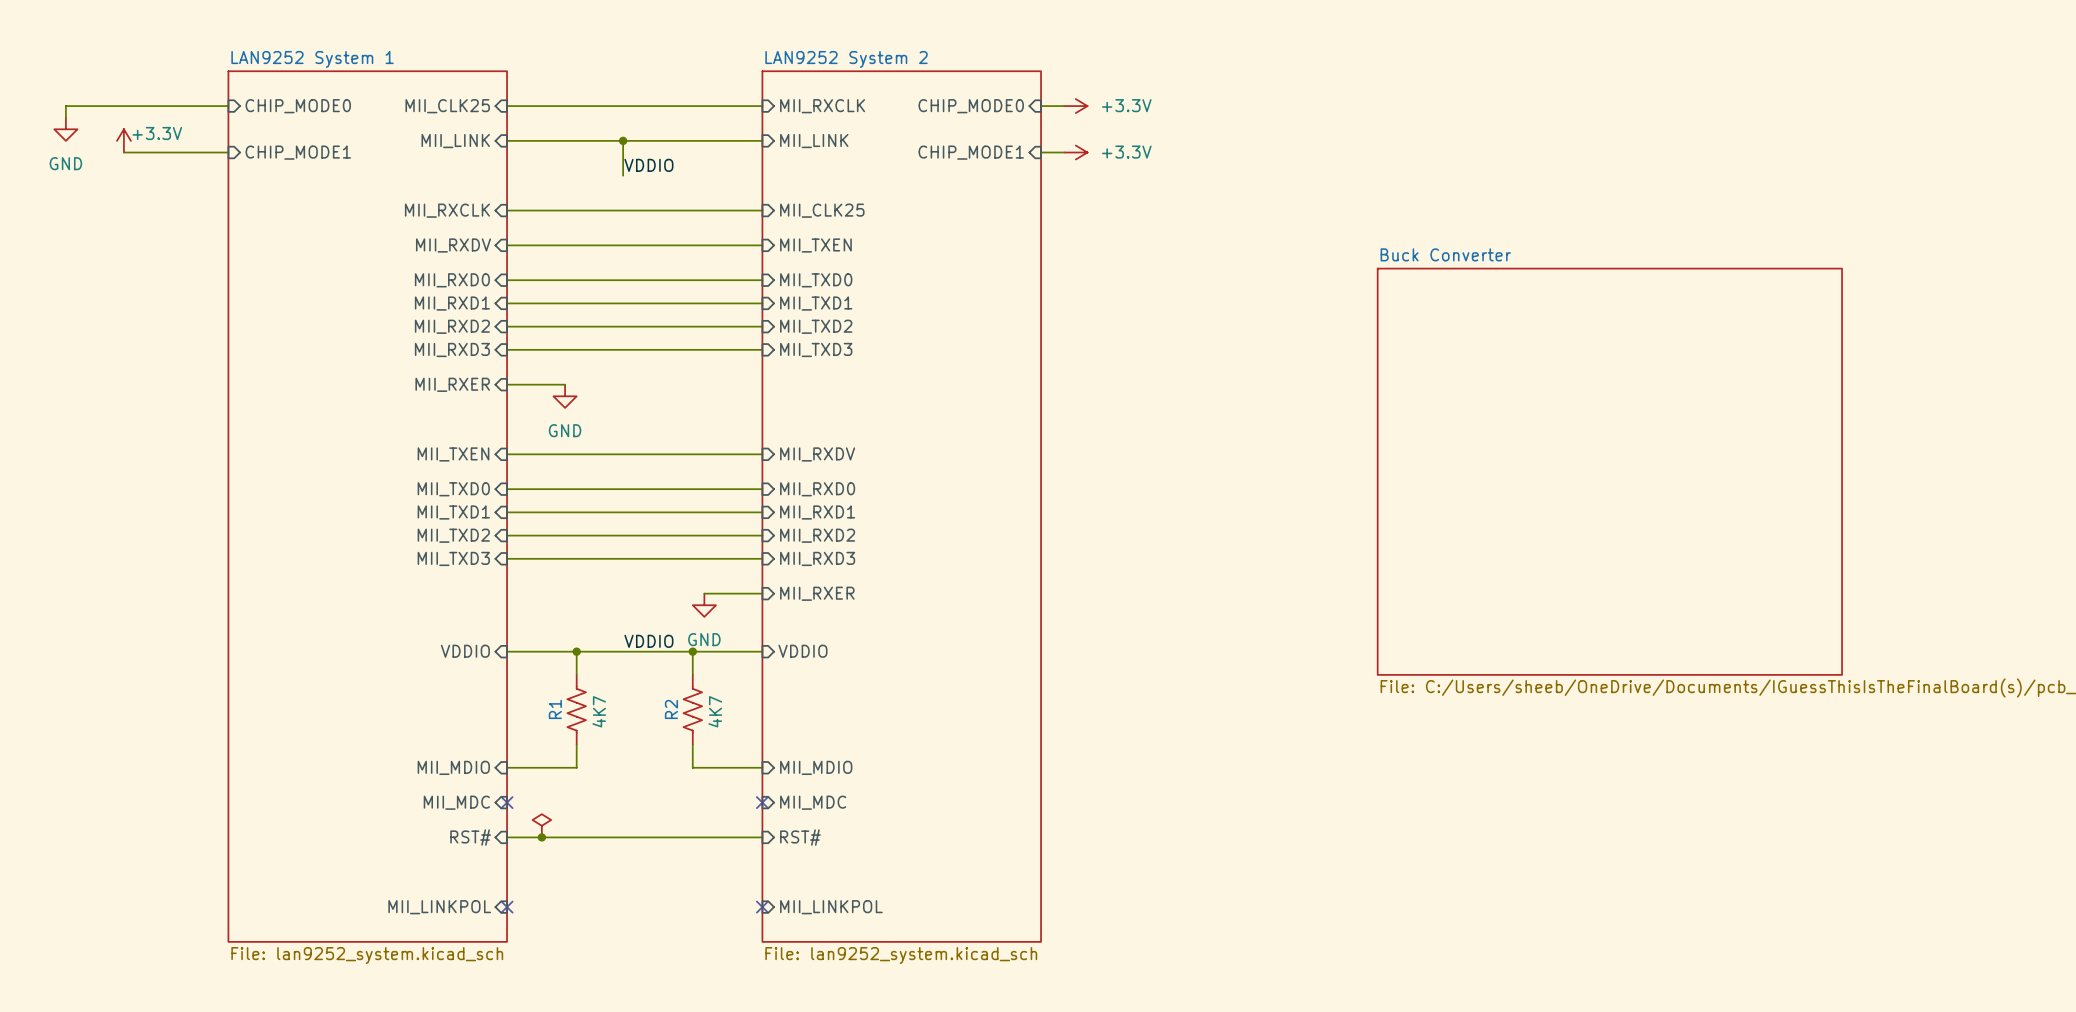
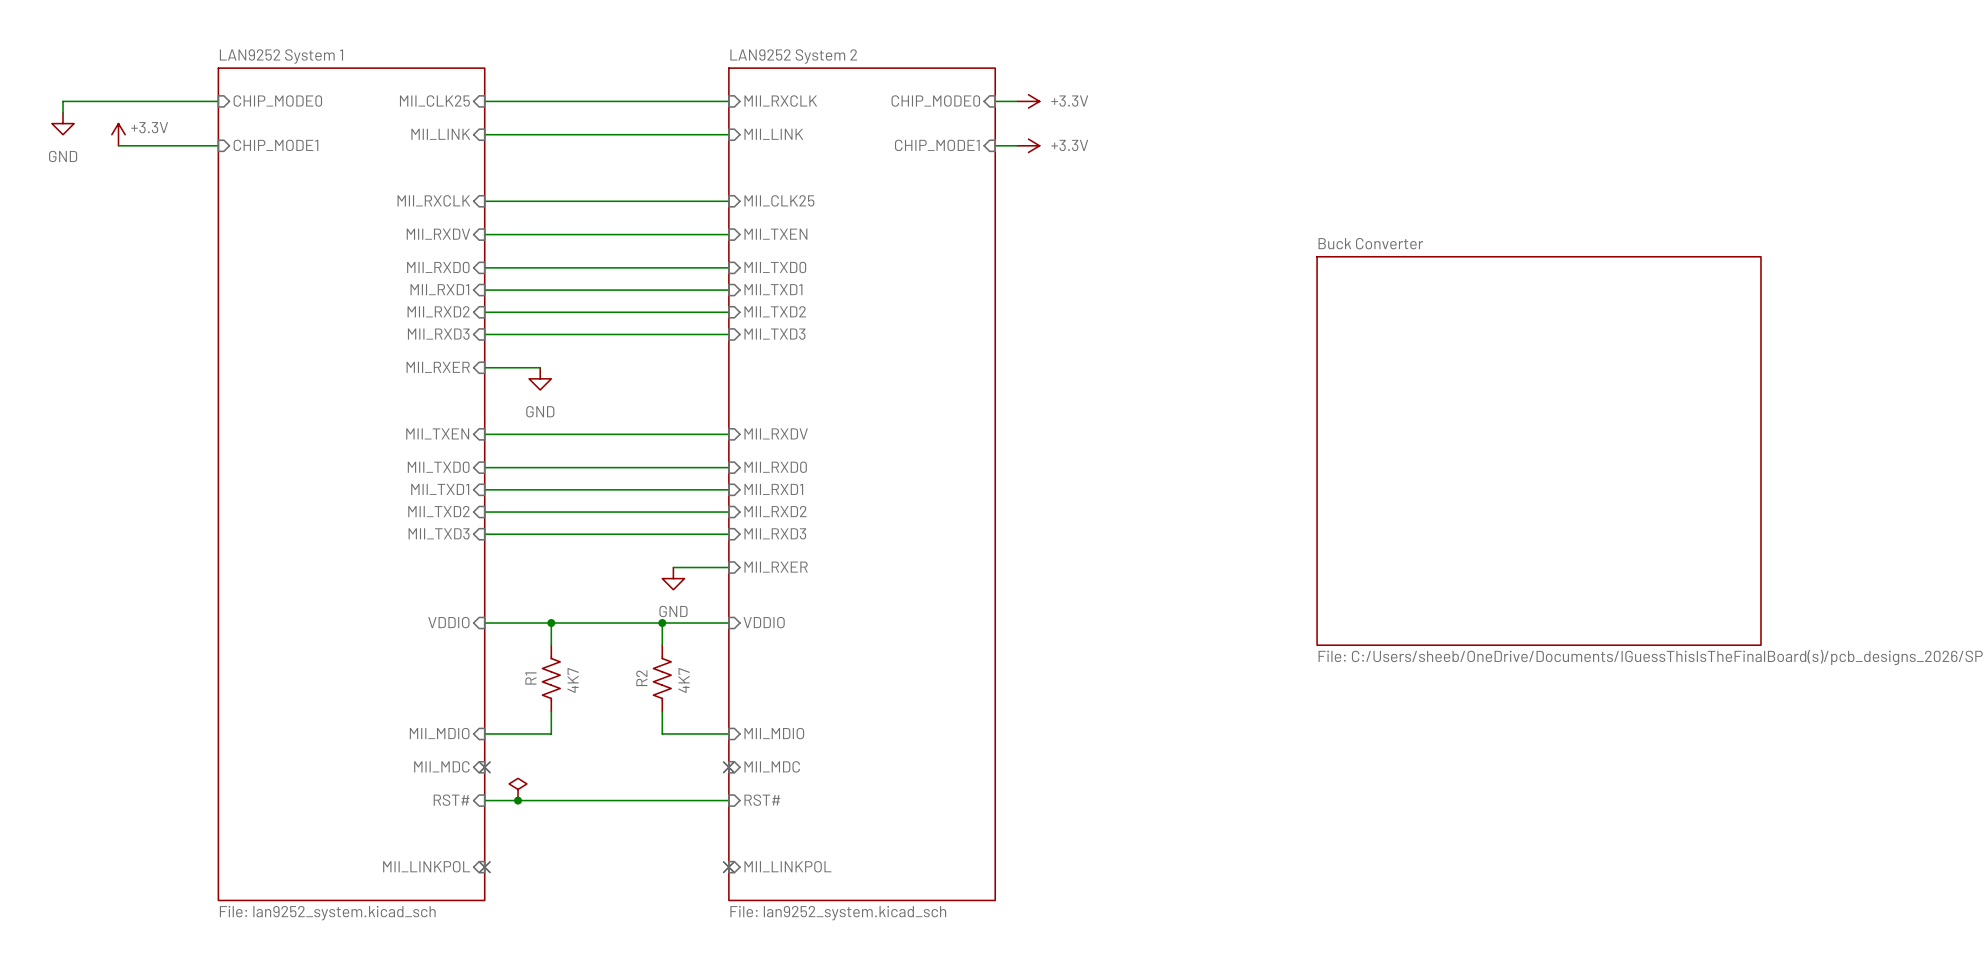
wire: (623, 140) (623, 175) -> none
junction: (623, 140) -> none
label: VDDIO (648, 165) -> none
label: VDDIO (648, 641) -> none

